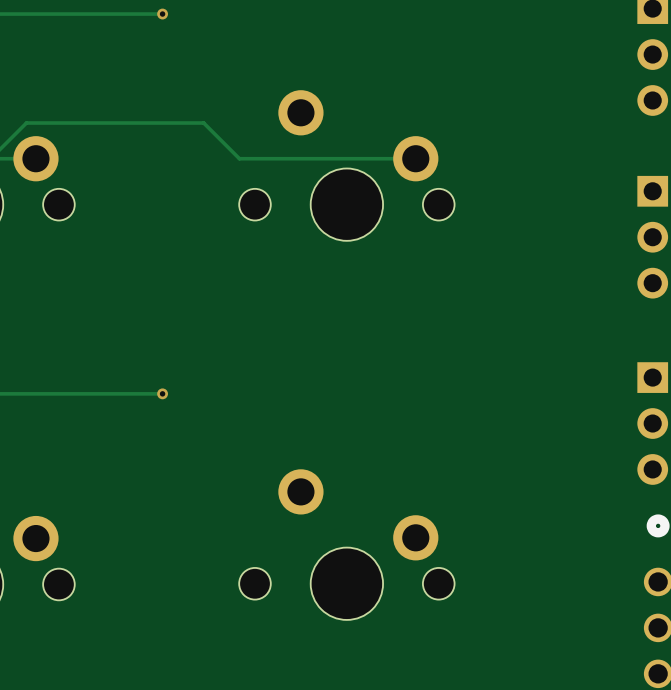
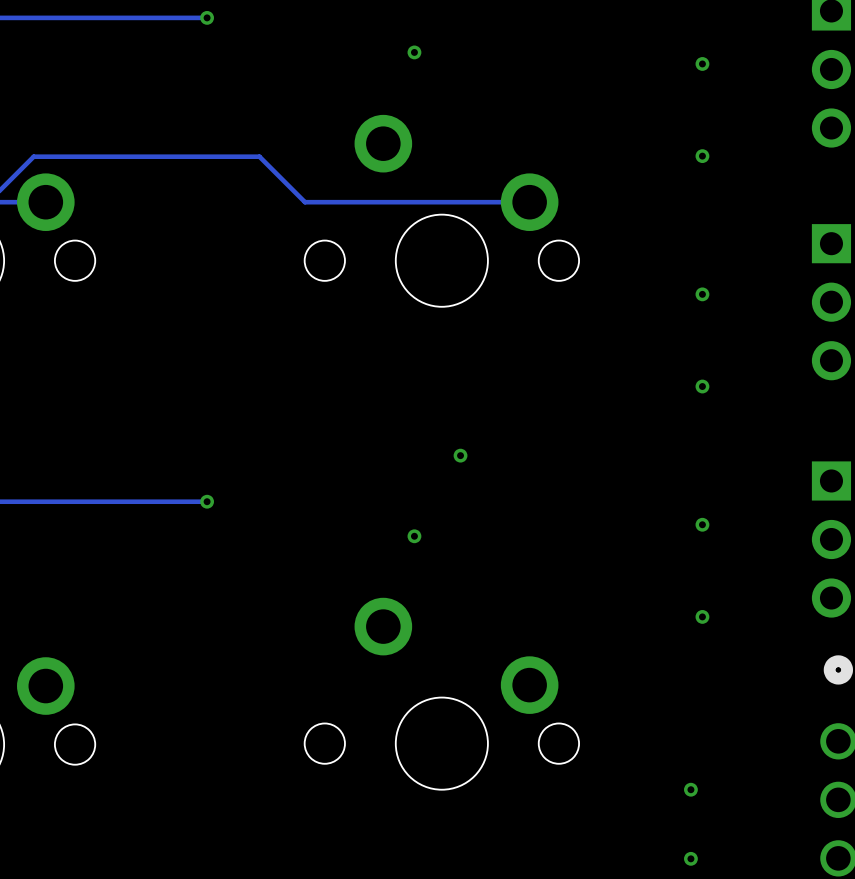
via: none -> (414, 52)
via: none -> (702, 63)
via: none -> (702, 156)
via: none -> (702, 294)
via: none -> (702, 386)
via: none -> (460, 455)
via: none -> (702, 524)
via: none -> (414, 536)
via: none -> (702, 616)
via: none -> (690, 789)
via: none -> (690, 858)

